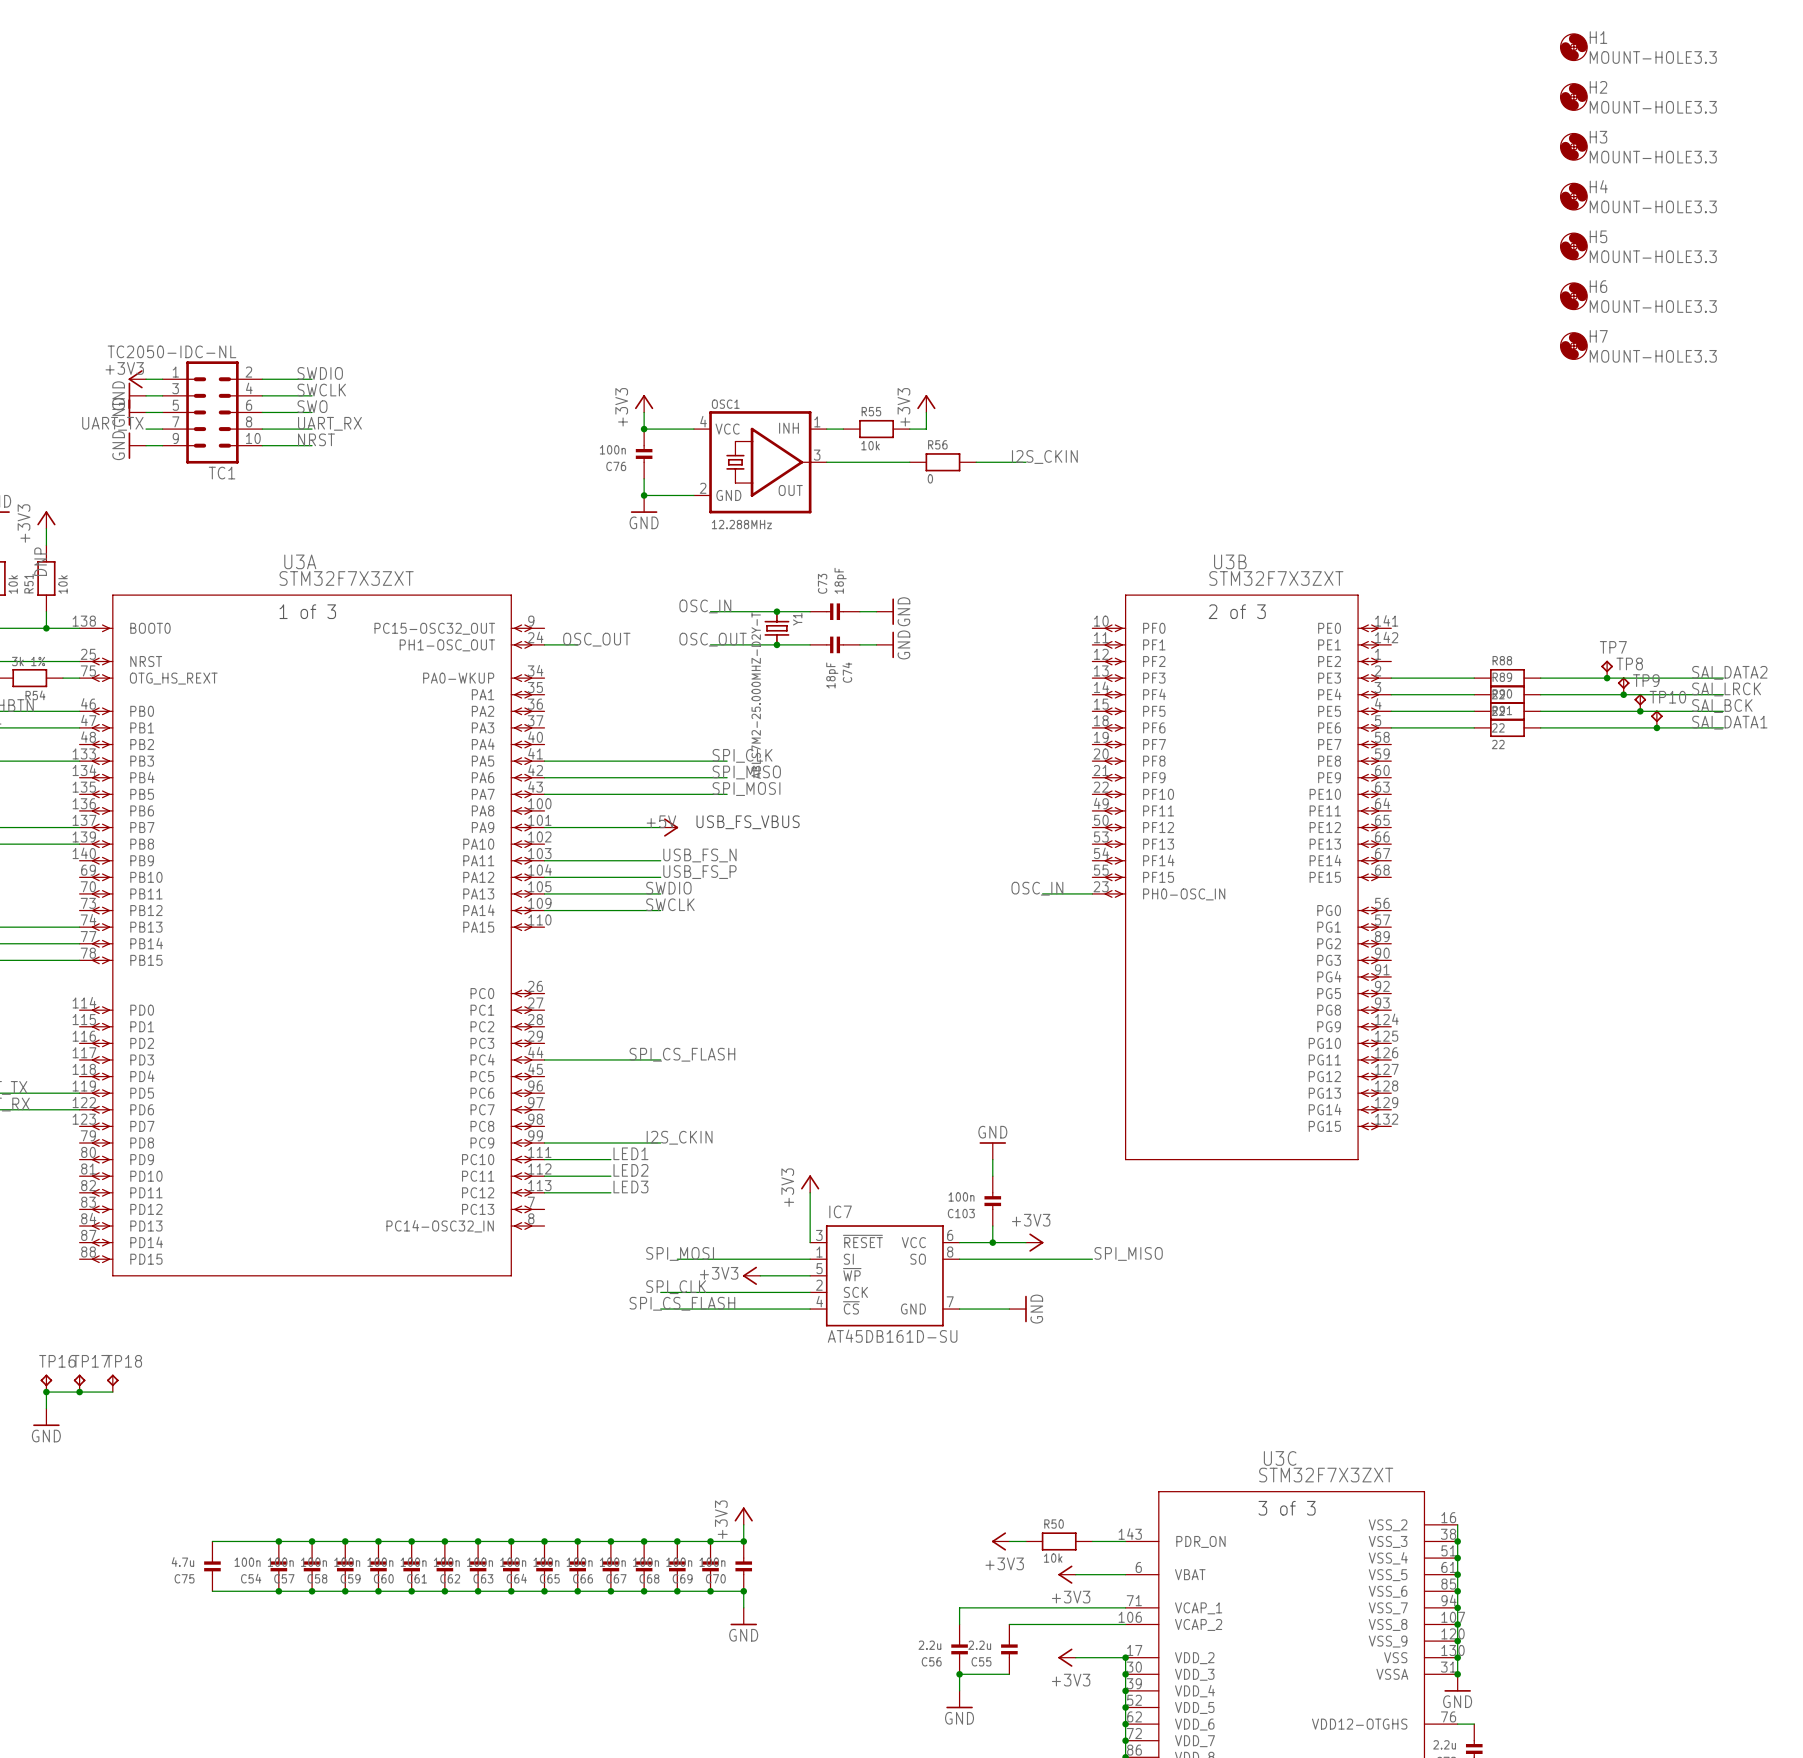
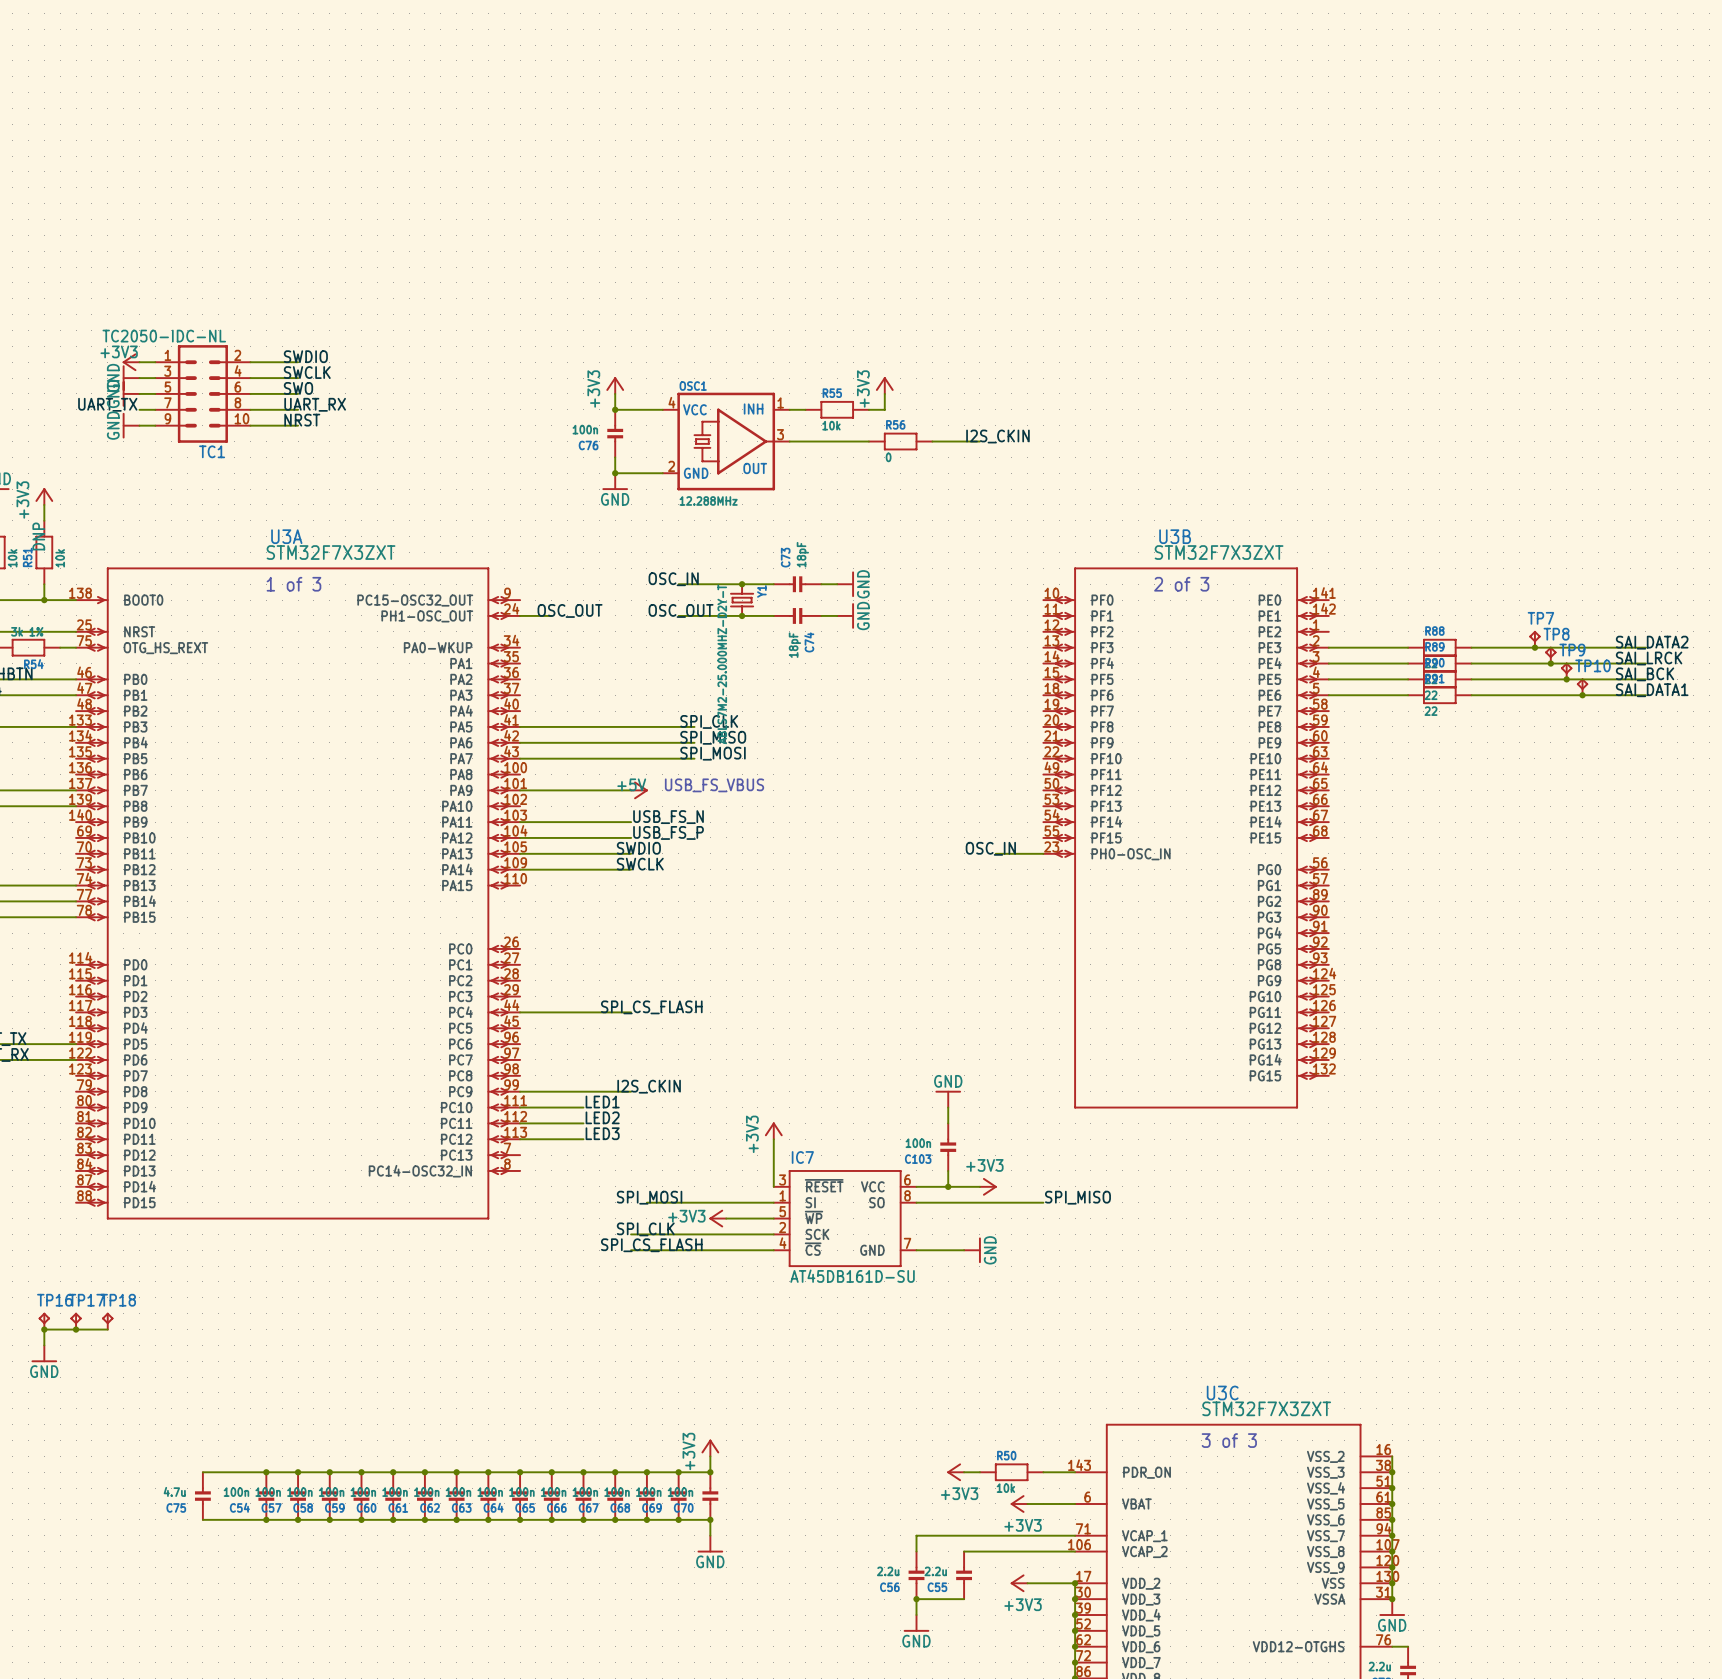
H1: MOUNT-HOLE3.3 (1573, 47) -> none
H2: MOUNT-HOLE3.3 (1573, 97) -> none
H3: MOUNT-HOLE3.3 (1573, 146) -> none
H4: MOUNT-HOLE3.3 (1573, 196) -> none
H5: MOUNT-HOLE3.3 (1573, 246) -> none
H6: MOUNT-HOLE3.3 (1573, 296) -> none
H7: MOUNT-HOLE3.3 (1573, 346) -> none

